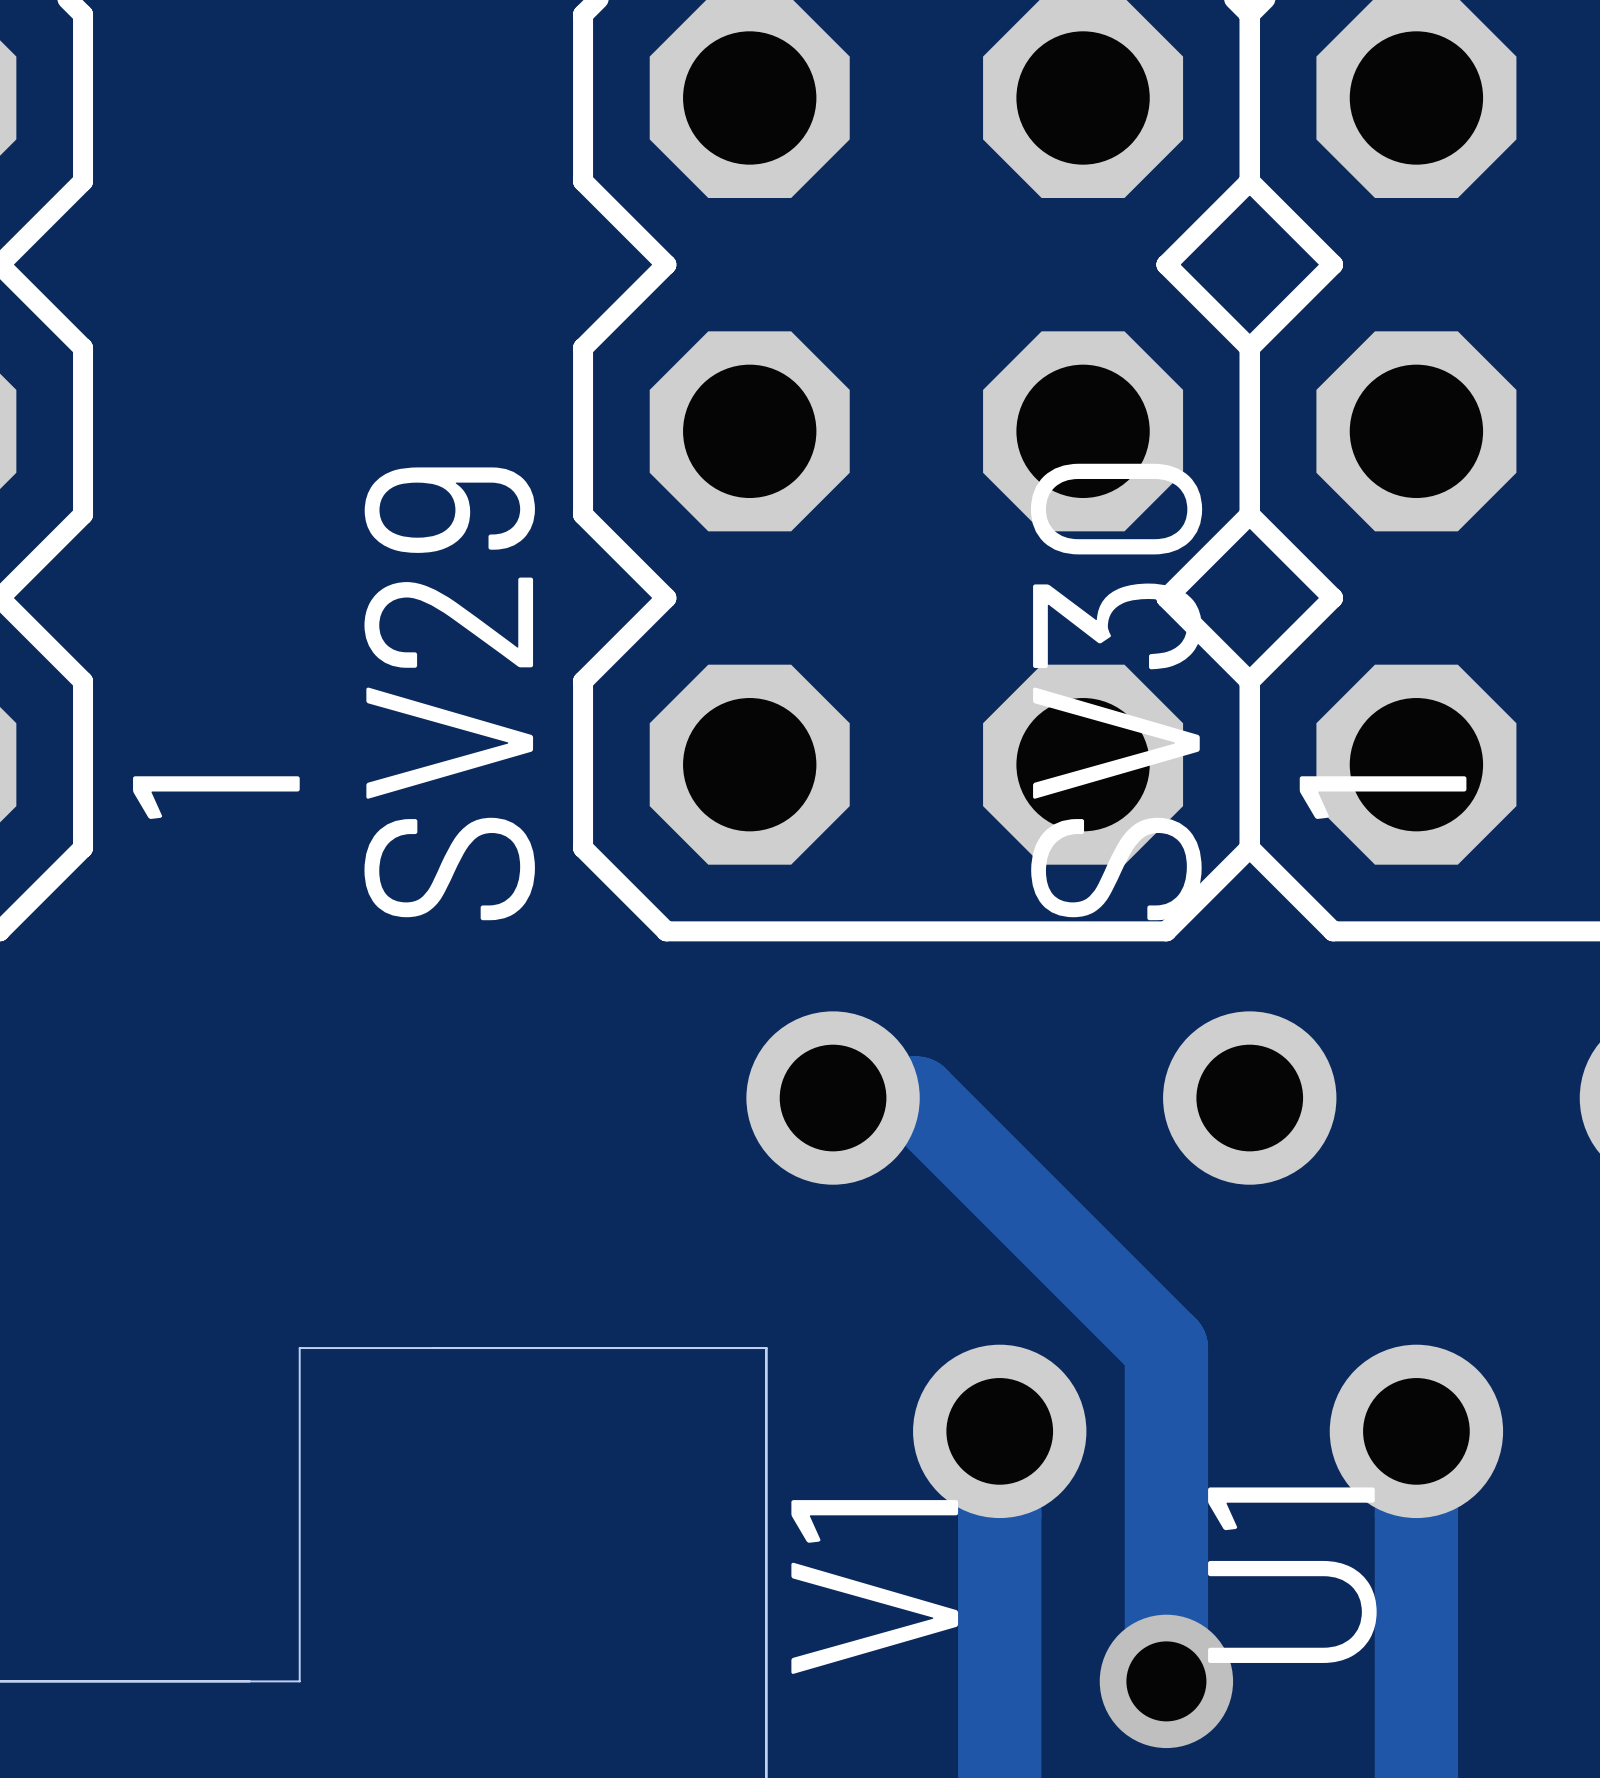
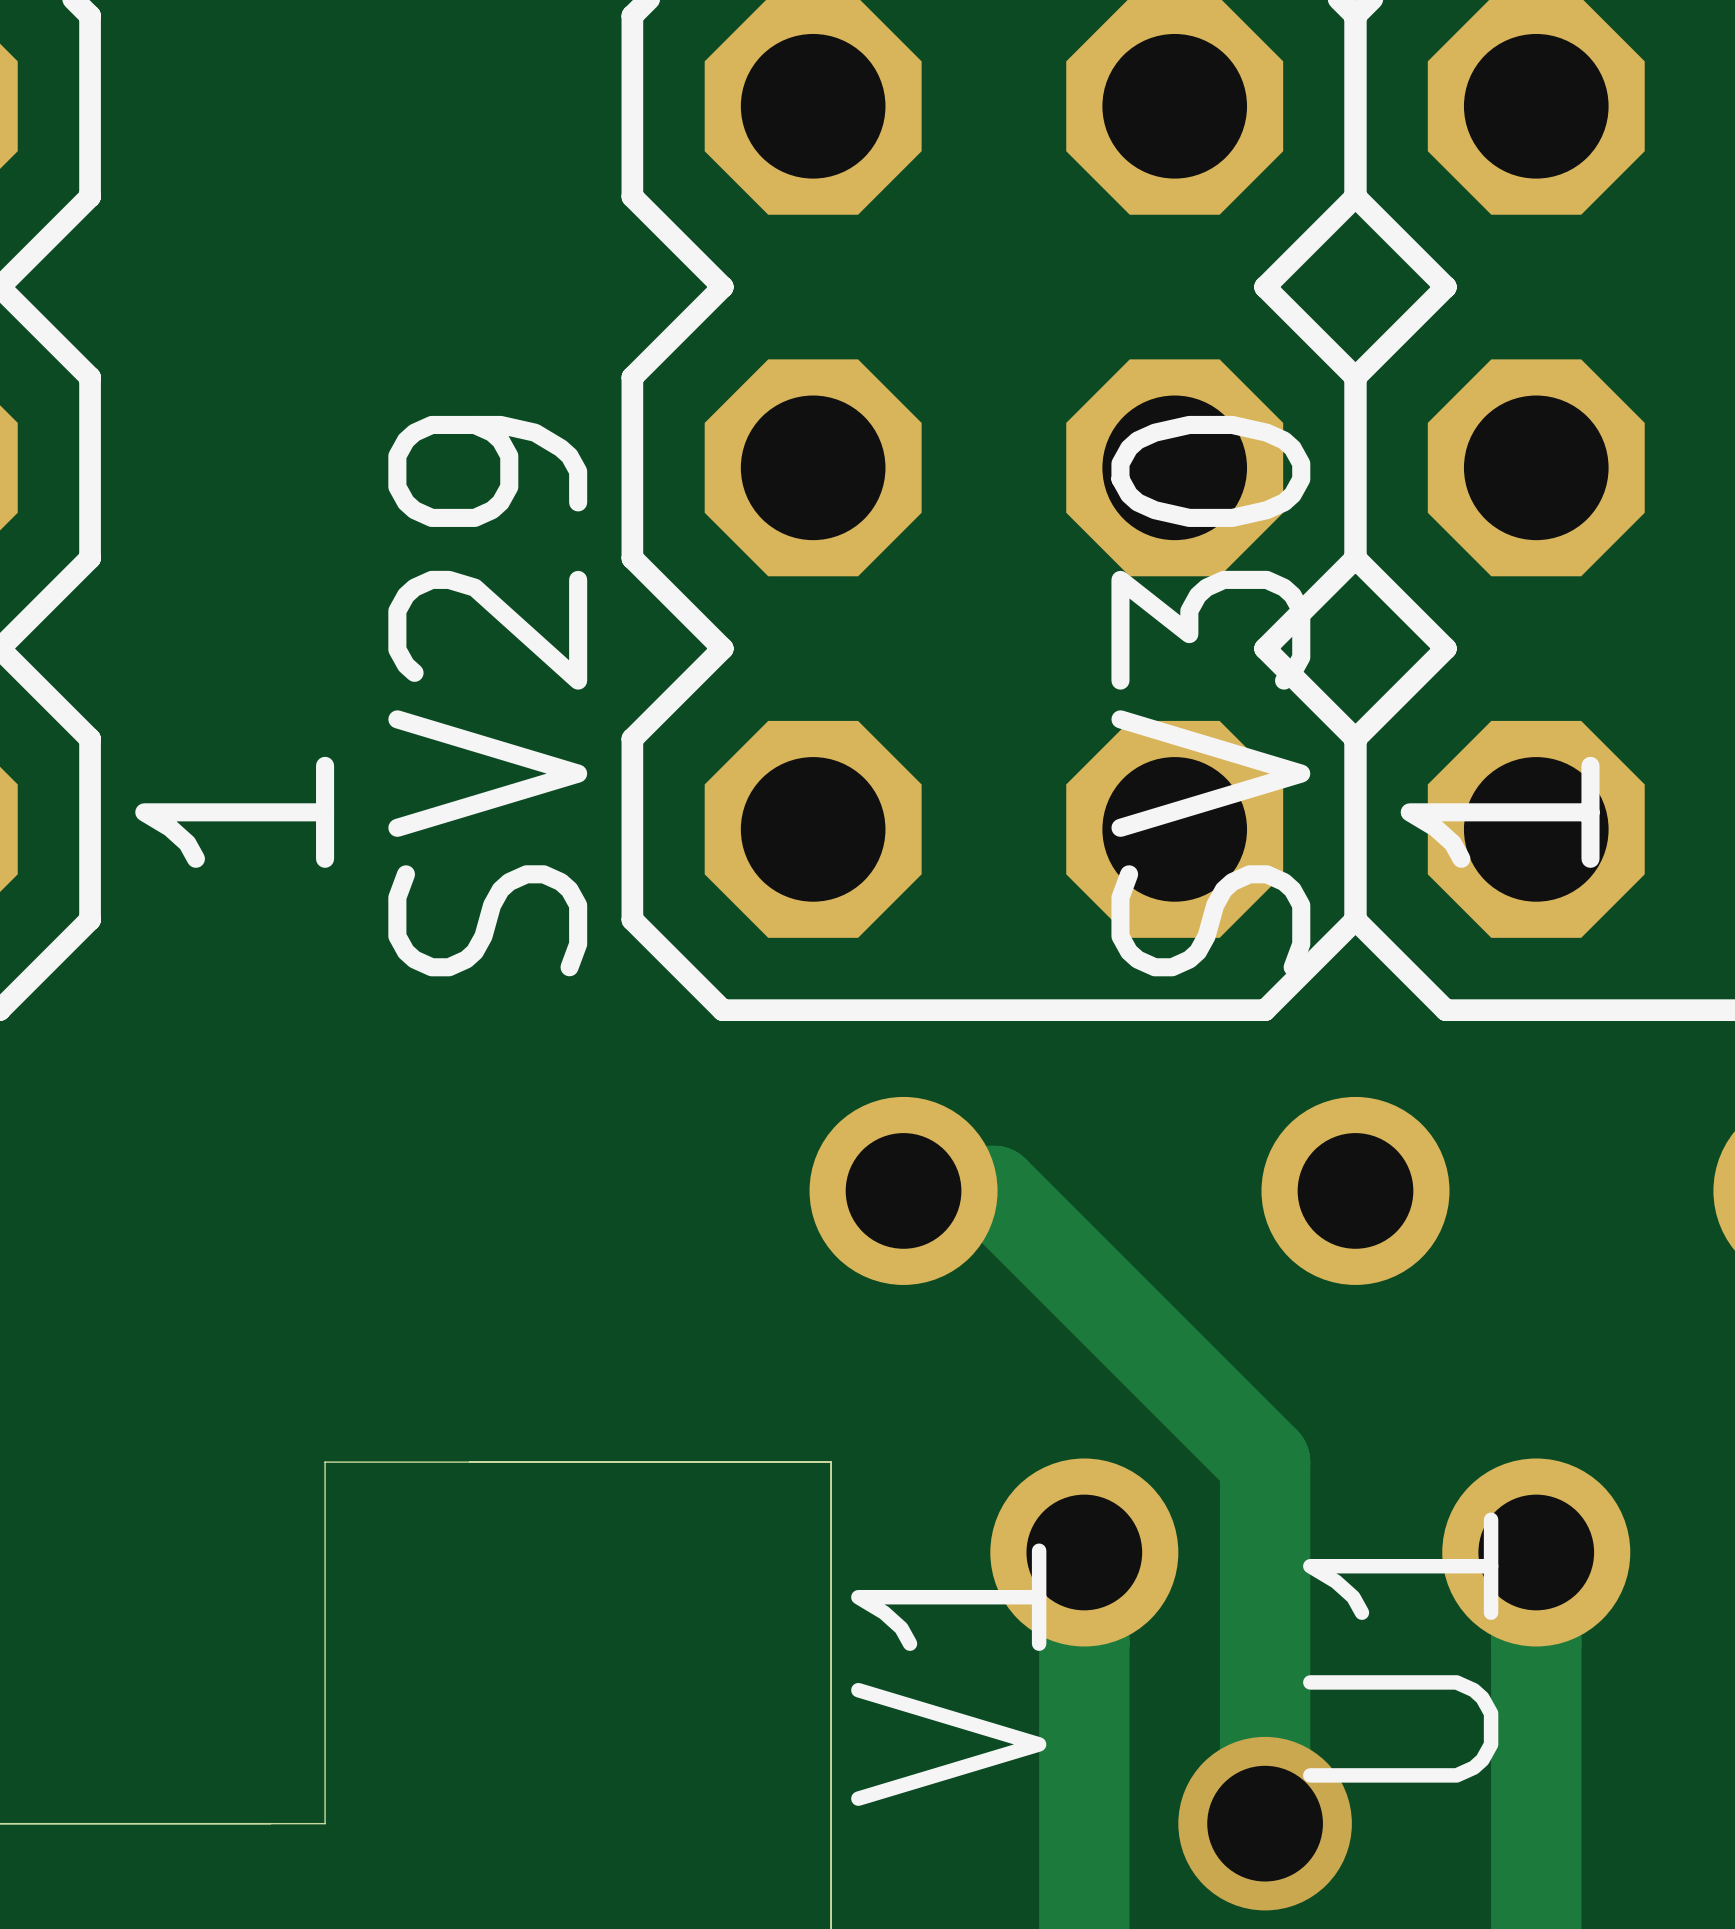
via size: [1099, 1614, 1234, 1749] -> [1178, 1736, 1352, 1911]

